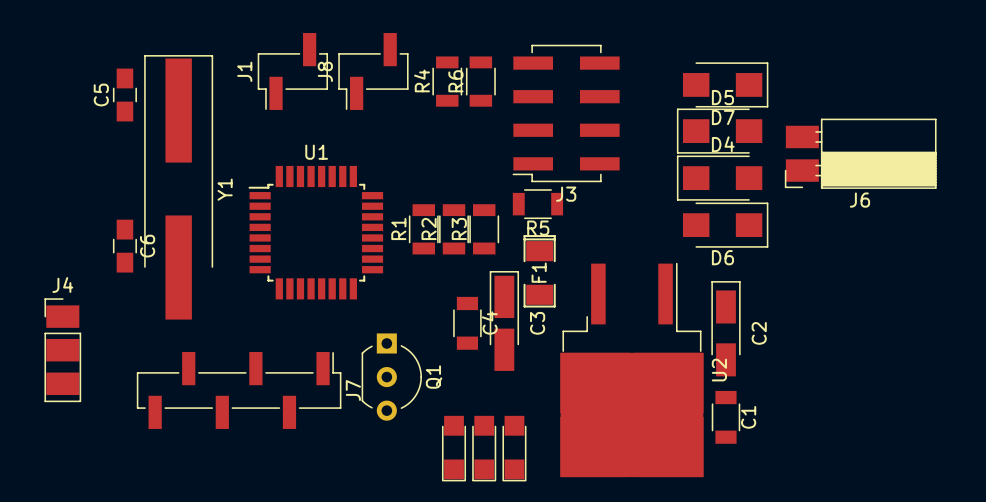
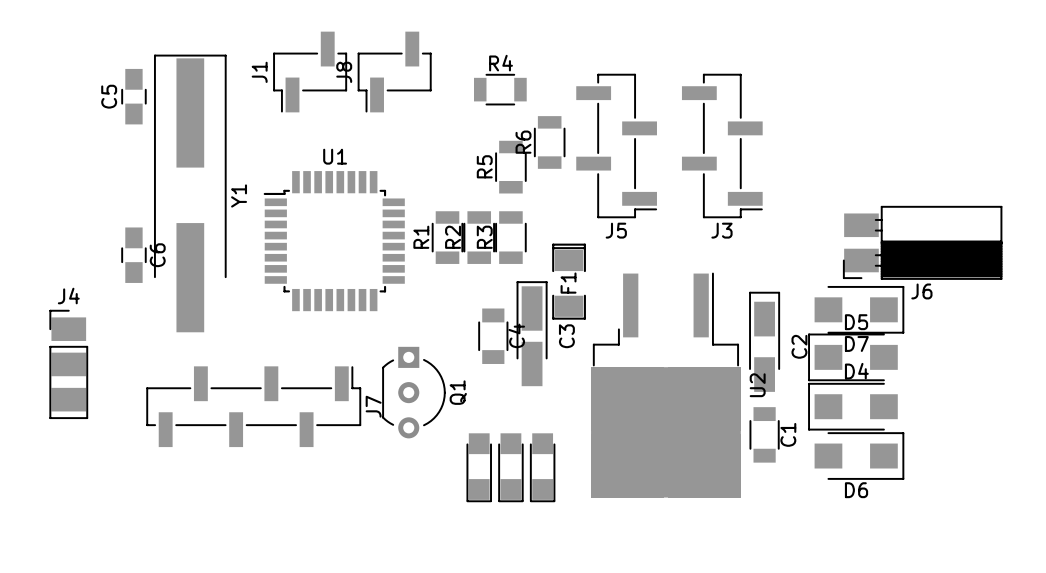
J3 footprint: [512, 44, 620, 183] -> [681, 73, 763, 219]
R4 rotation: 0° (447, 81) -> 90° clockwise (500, 89)
R6 position: (480, 81) -> (549, 142)
D7 position: (725, 84) -> (859, 309)
D5 position: (719, 131) -> (853, 357)
J5: none -> (616, 145)
J6 position: (860, 153) -> (922, 242)
D4 position: (719, 178) -> (853, 406)
R5 rotation: 0° (537, 204) -> 90° clockwise (510, 167)
R5 position: (537, 204) -> (510, 167)
D6 position: (725, 225) -> (859, 456)

